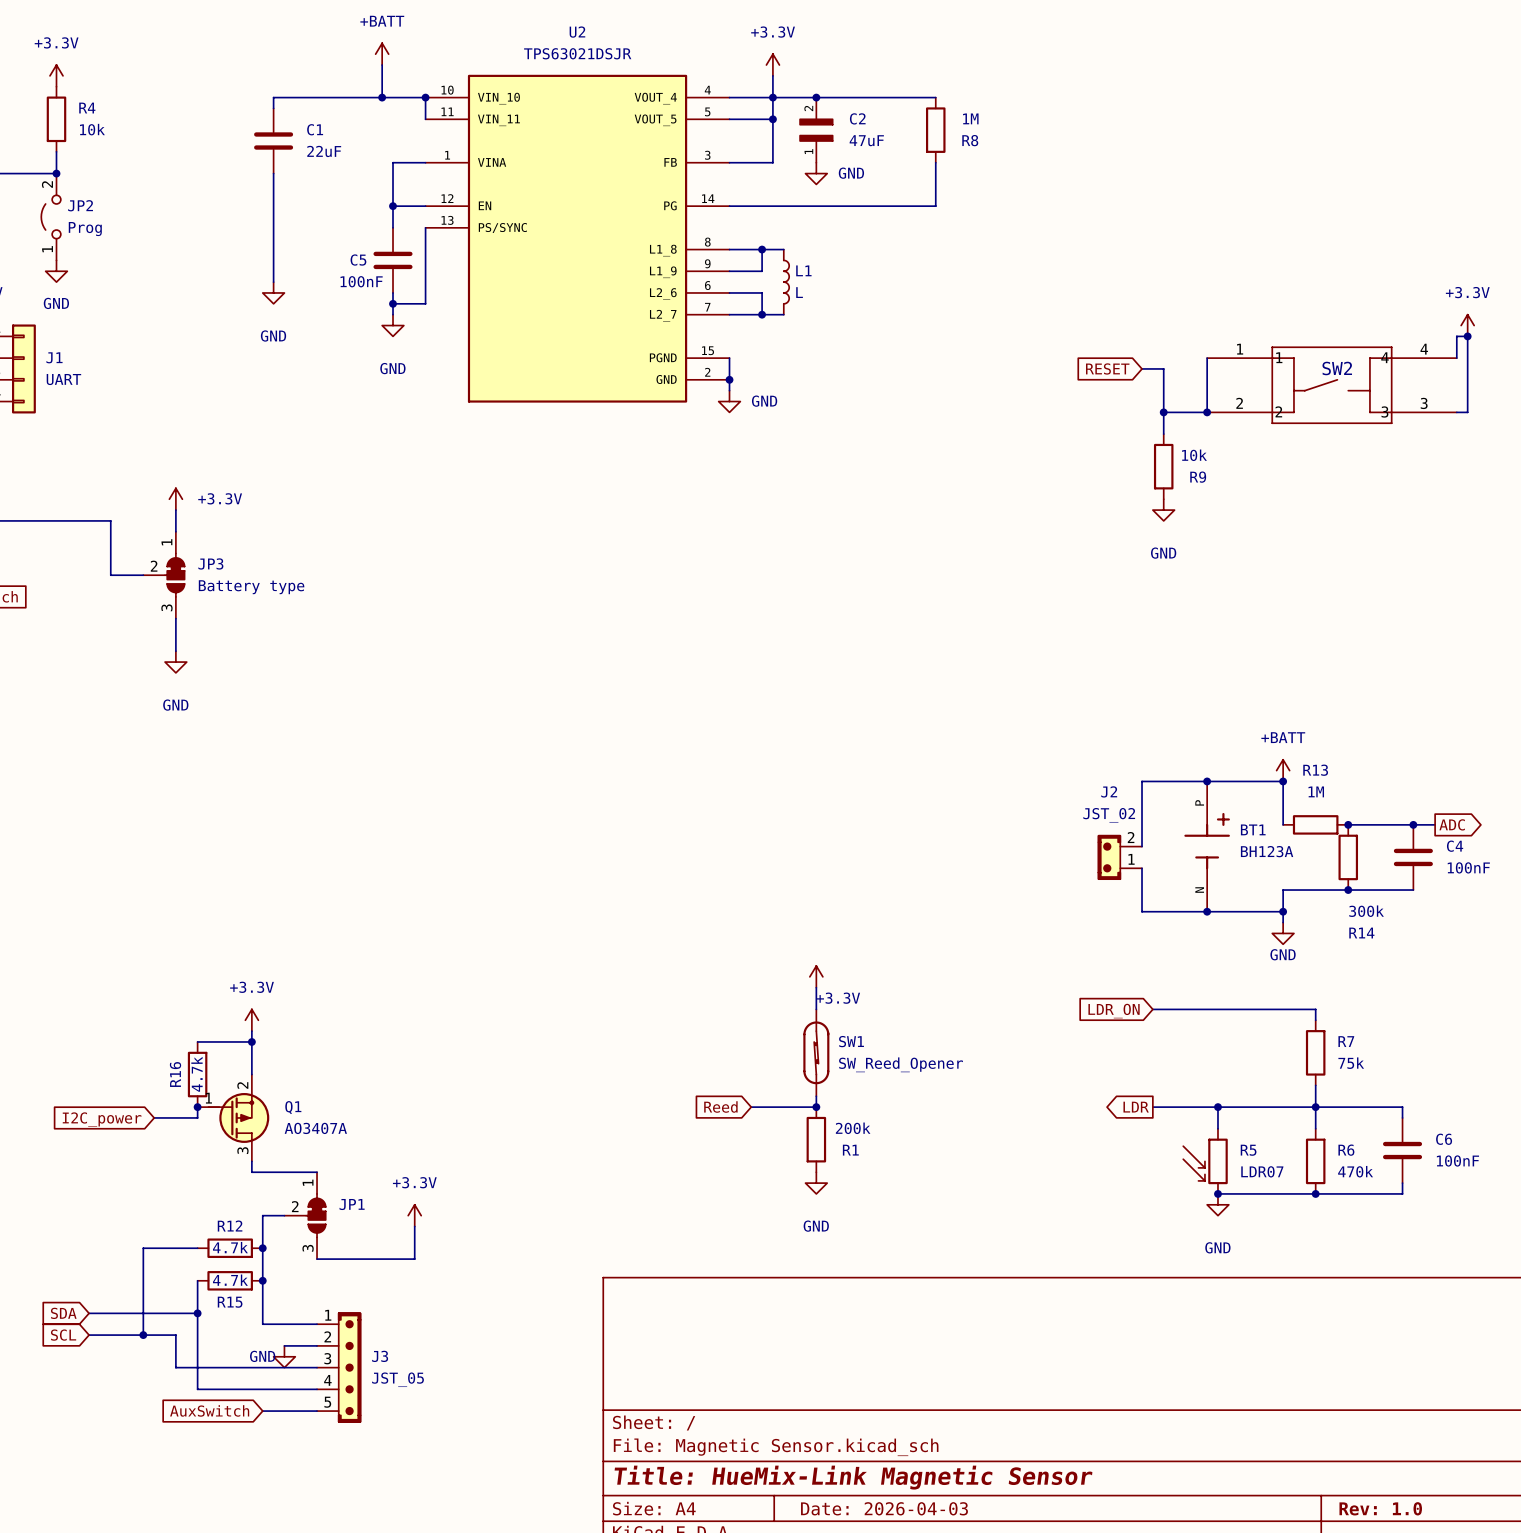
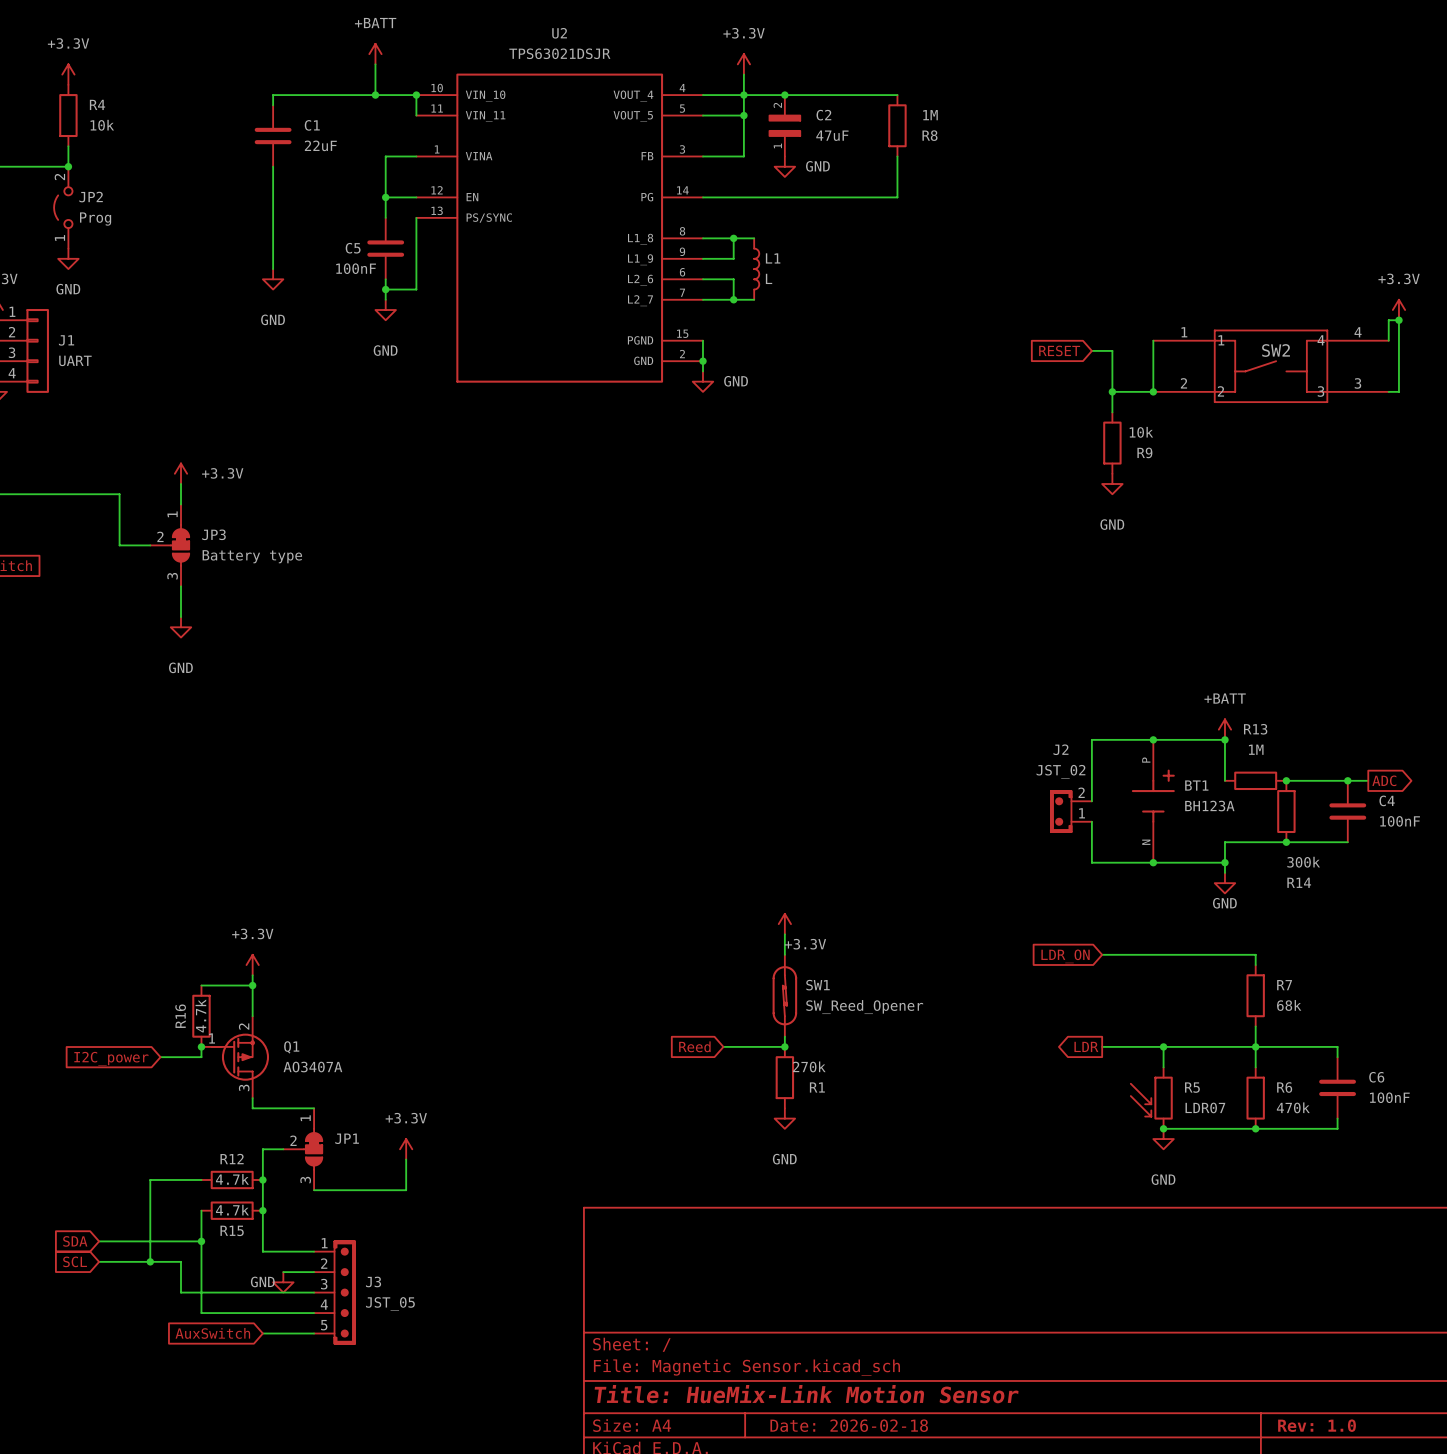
R7 value: 75k (1351, 1063) -> 68k (1289, 1005)
R1 value: 200k (853, 1128) -> 270k (809, 1066)
title block: Title: HueMix-Link Magnetic Sensor (853, 1477) -> Title: HueMix-Link Motion Sensor (806, 1394)
title block: Date: 2026-04-03 (884, 1508) -> Date: 2026-02-18 (849, 1425)

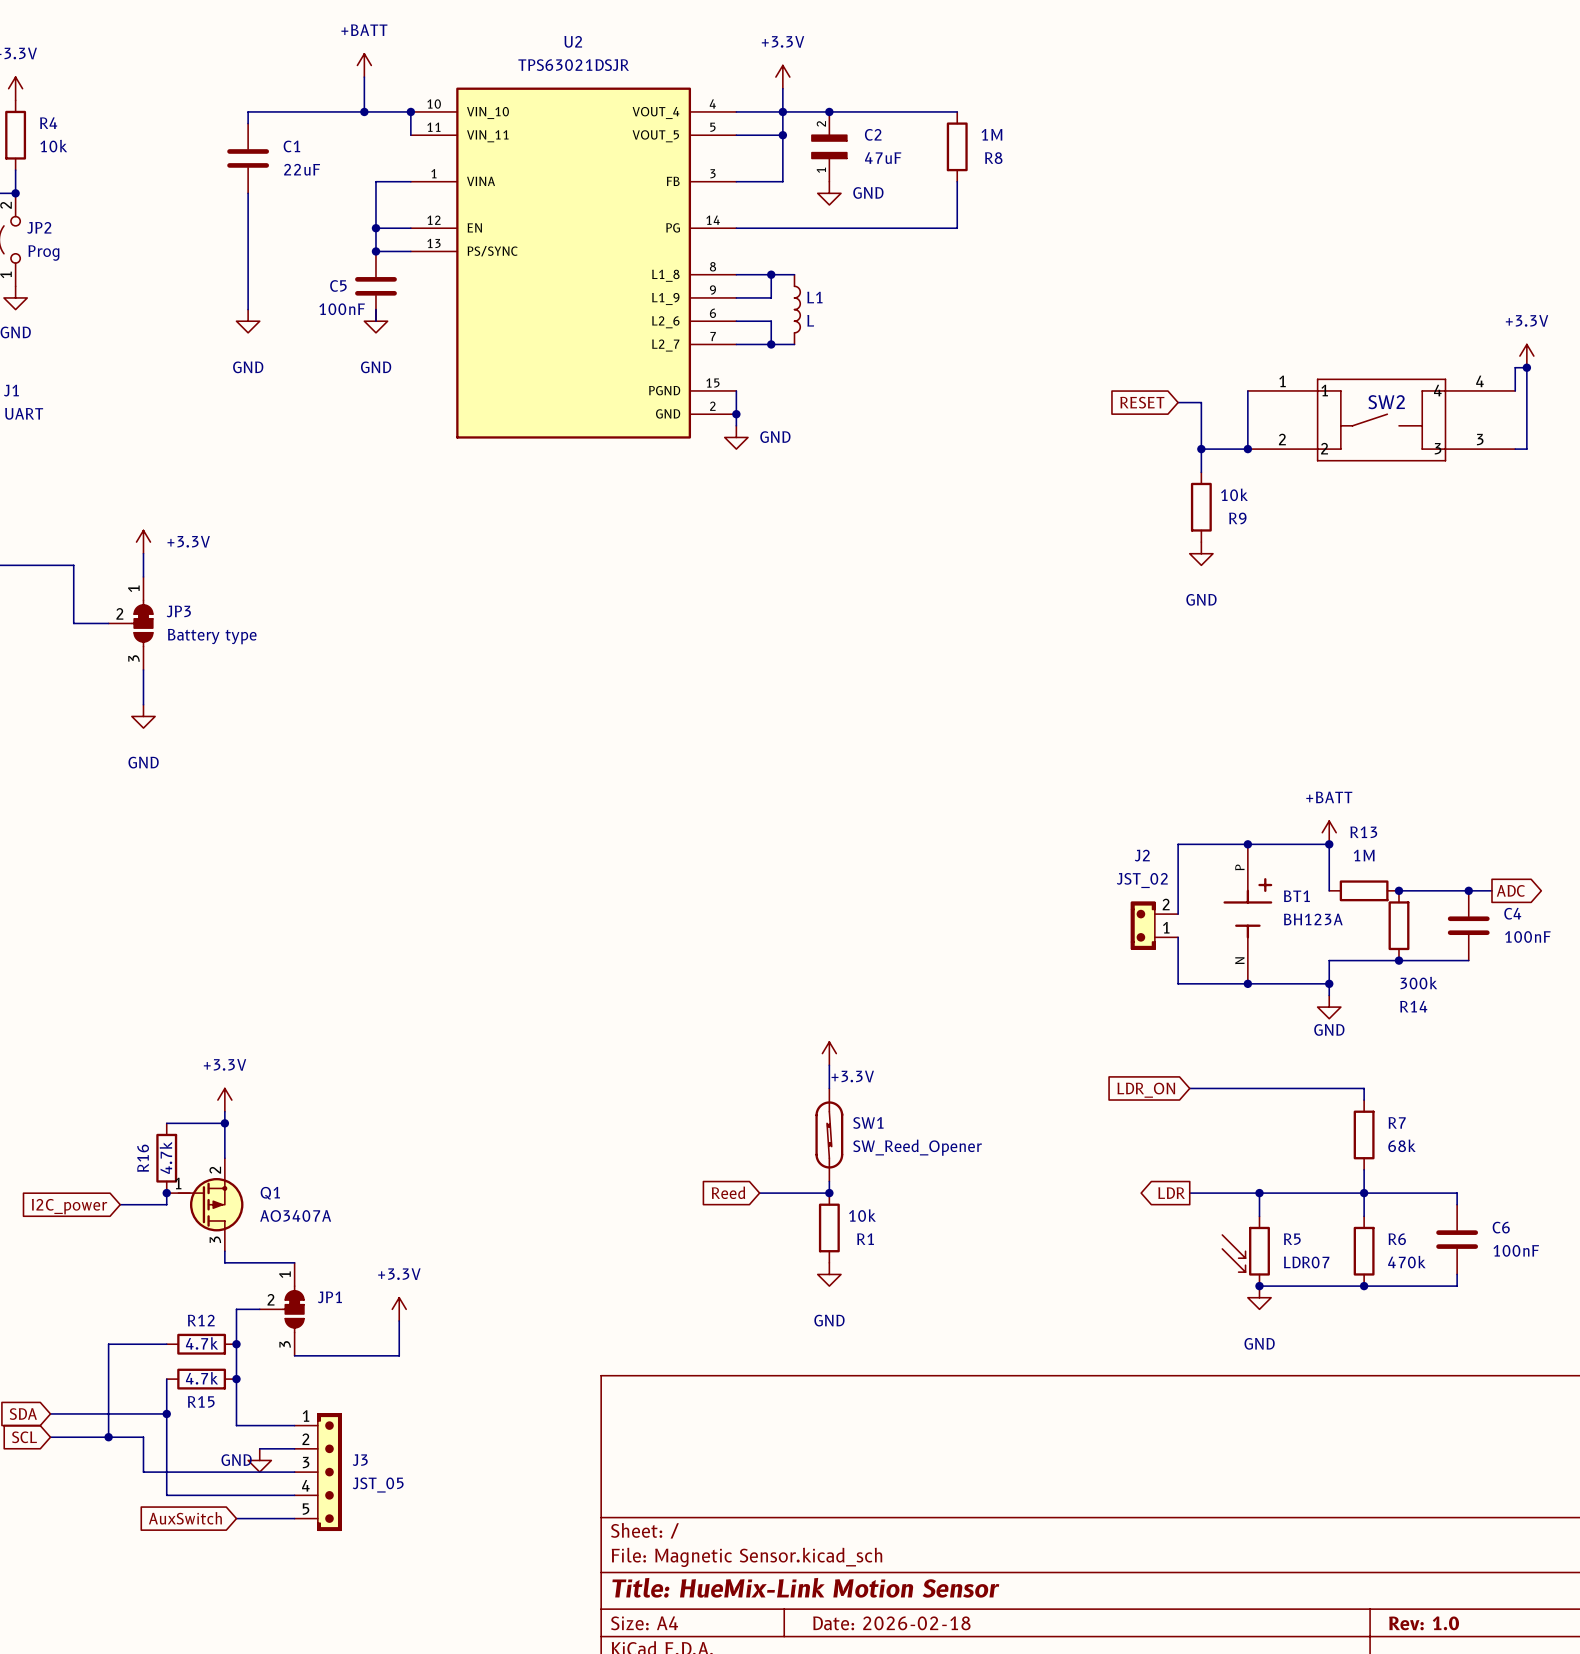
junction: none -> (375, 251)
wire: (416, 217) (416, 289) (385, 289) -> (410, 251) (375, 251)
junction: (385, 289) -> none
power symbol position: GND (385, 310) -> GND (375, 321)
R1 value: 270k (809, 1066) -> 10k (862, 1215)

